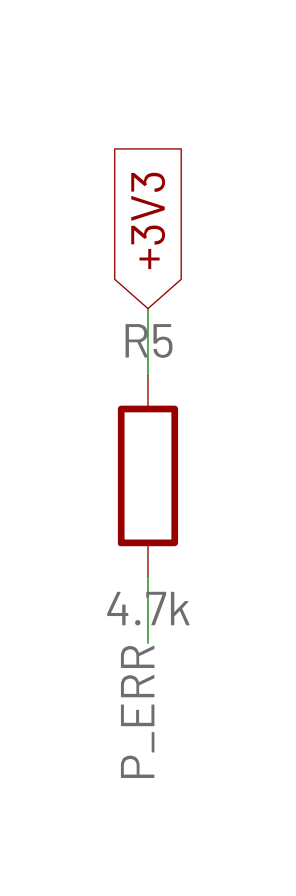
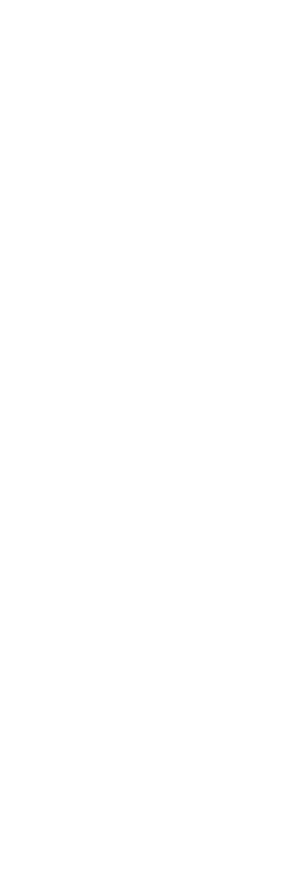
global label: +3V3 (148, 220) -> none
wire: (147, 308) (147, 375) -> none
R5: 4.7k (147, 475) -> none
wire: (147, 576) (147, 643) -> none
label: P_ERR (137, 711) -> none

